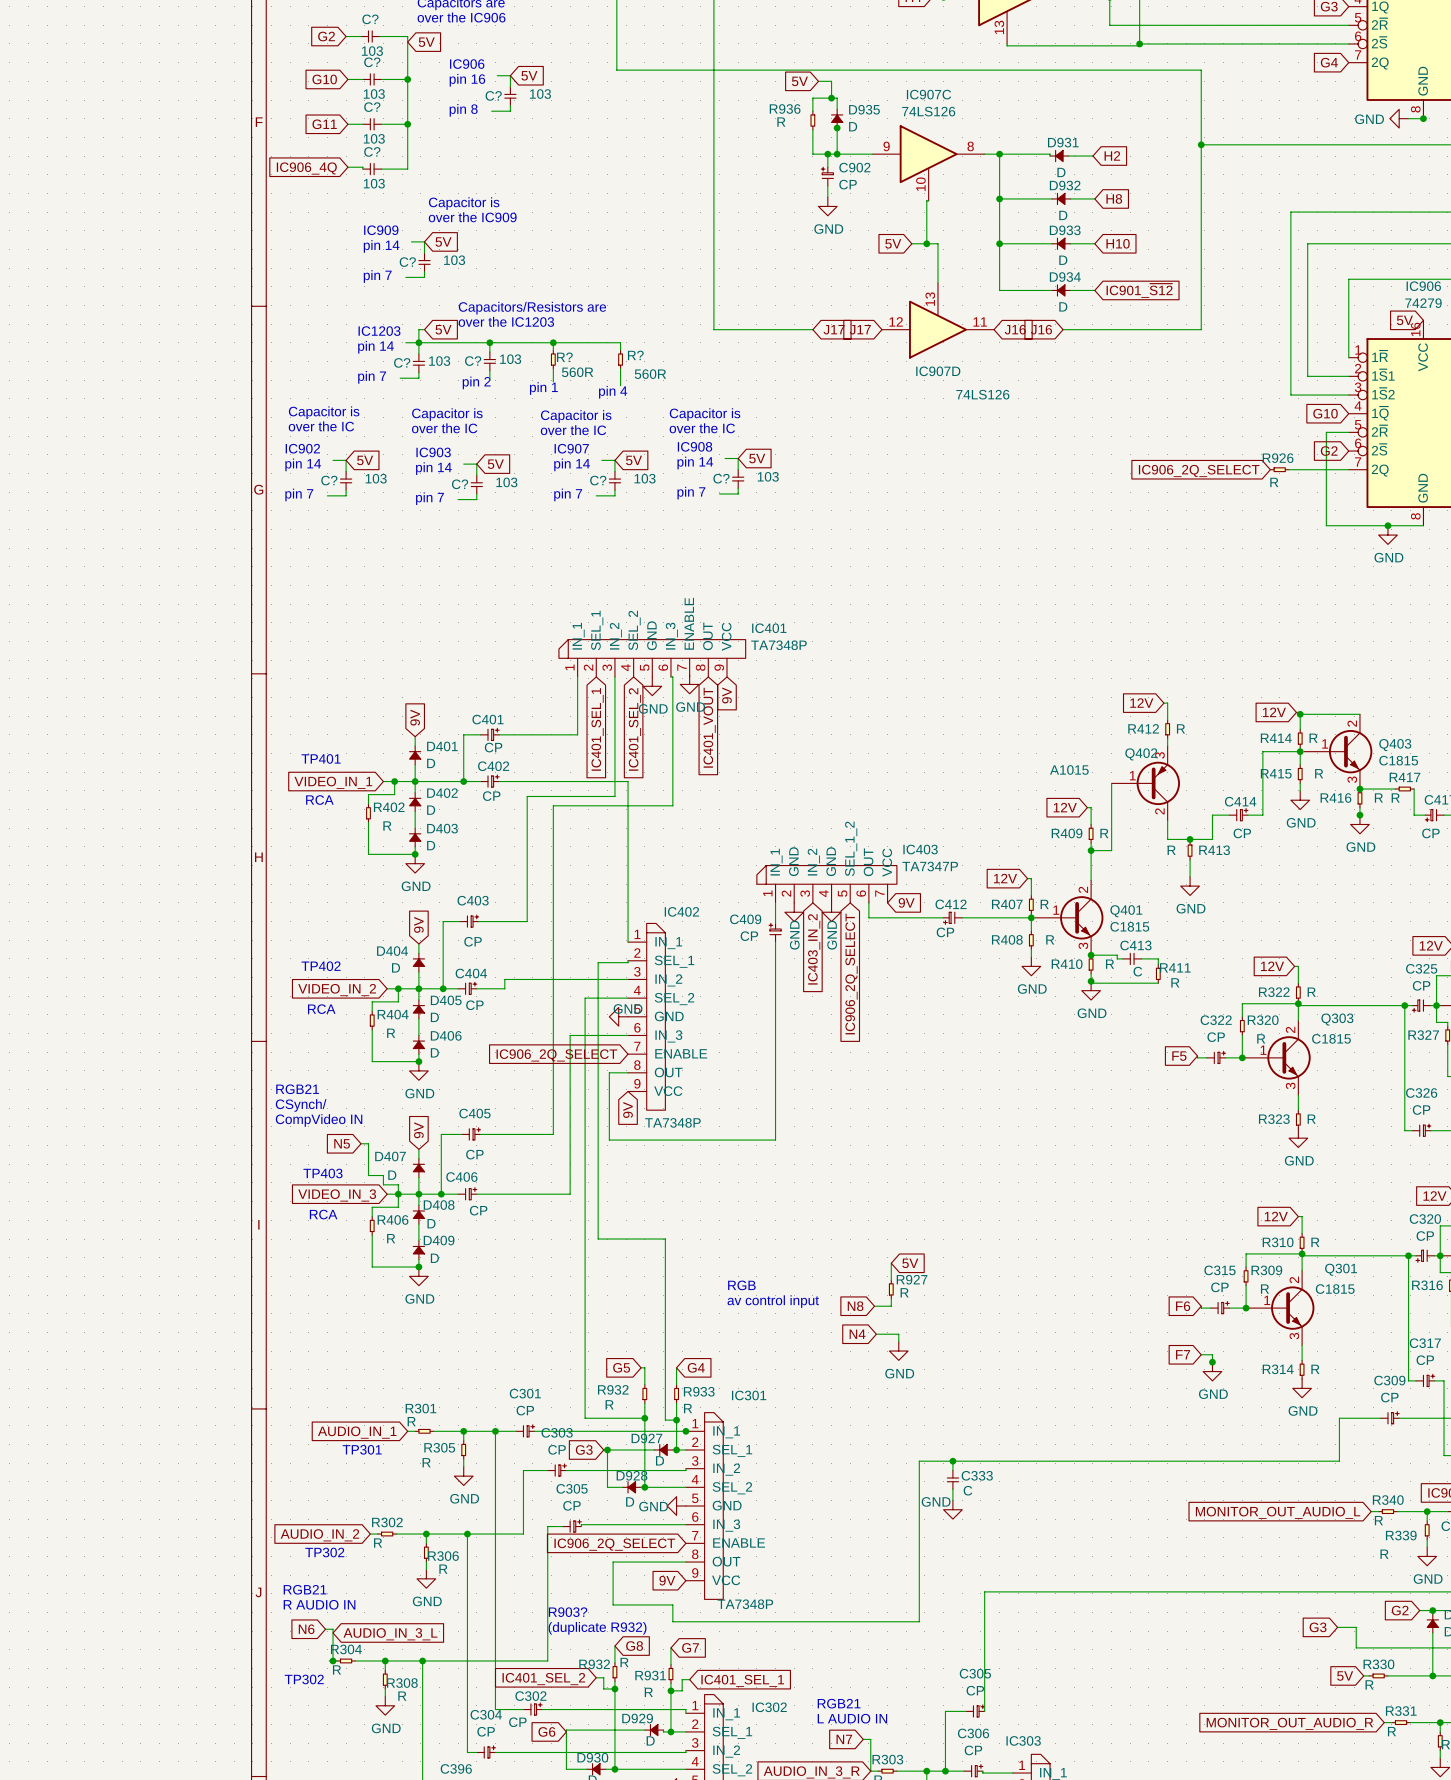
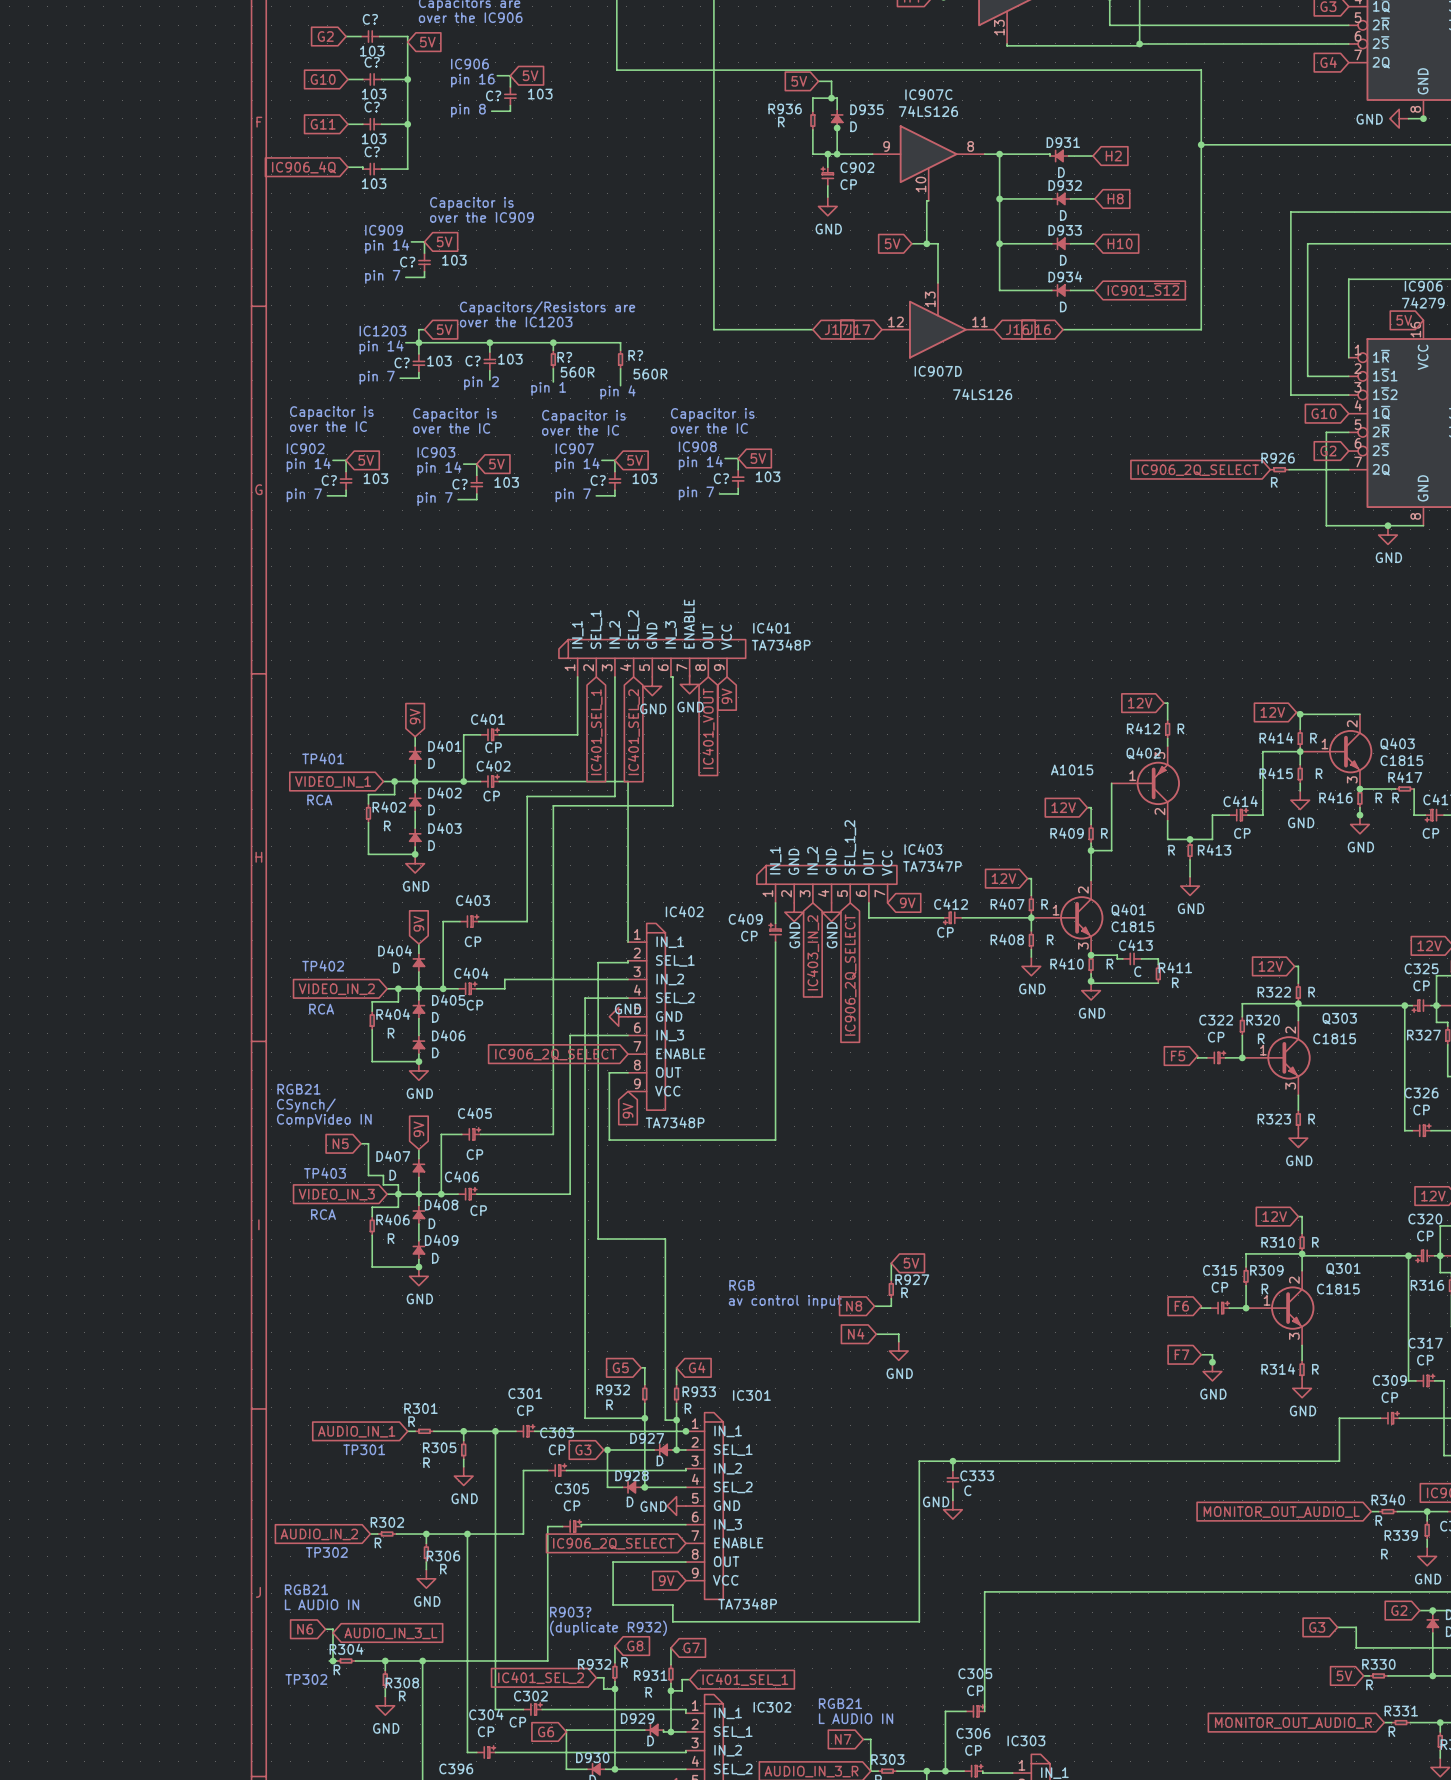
text: R AUDIO IN (319, 1604) -> L AUDIO IN (322, 1604)

